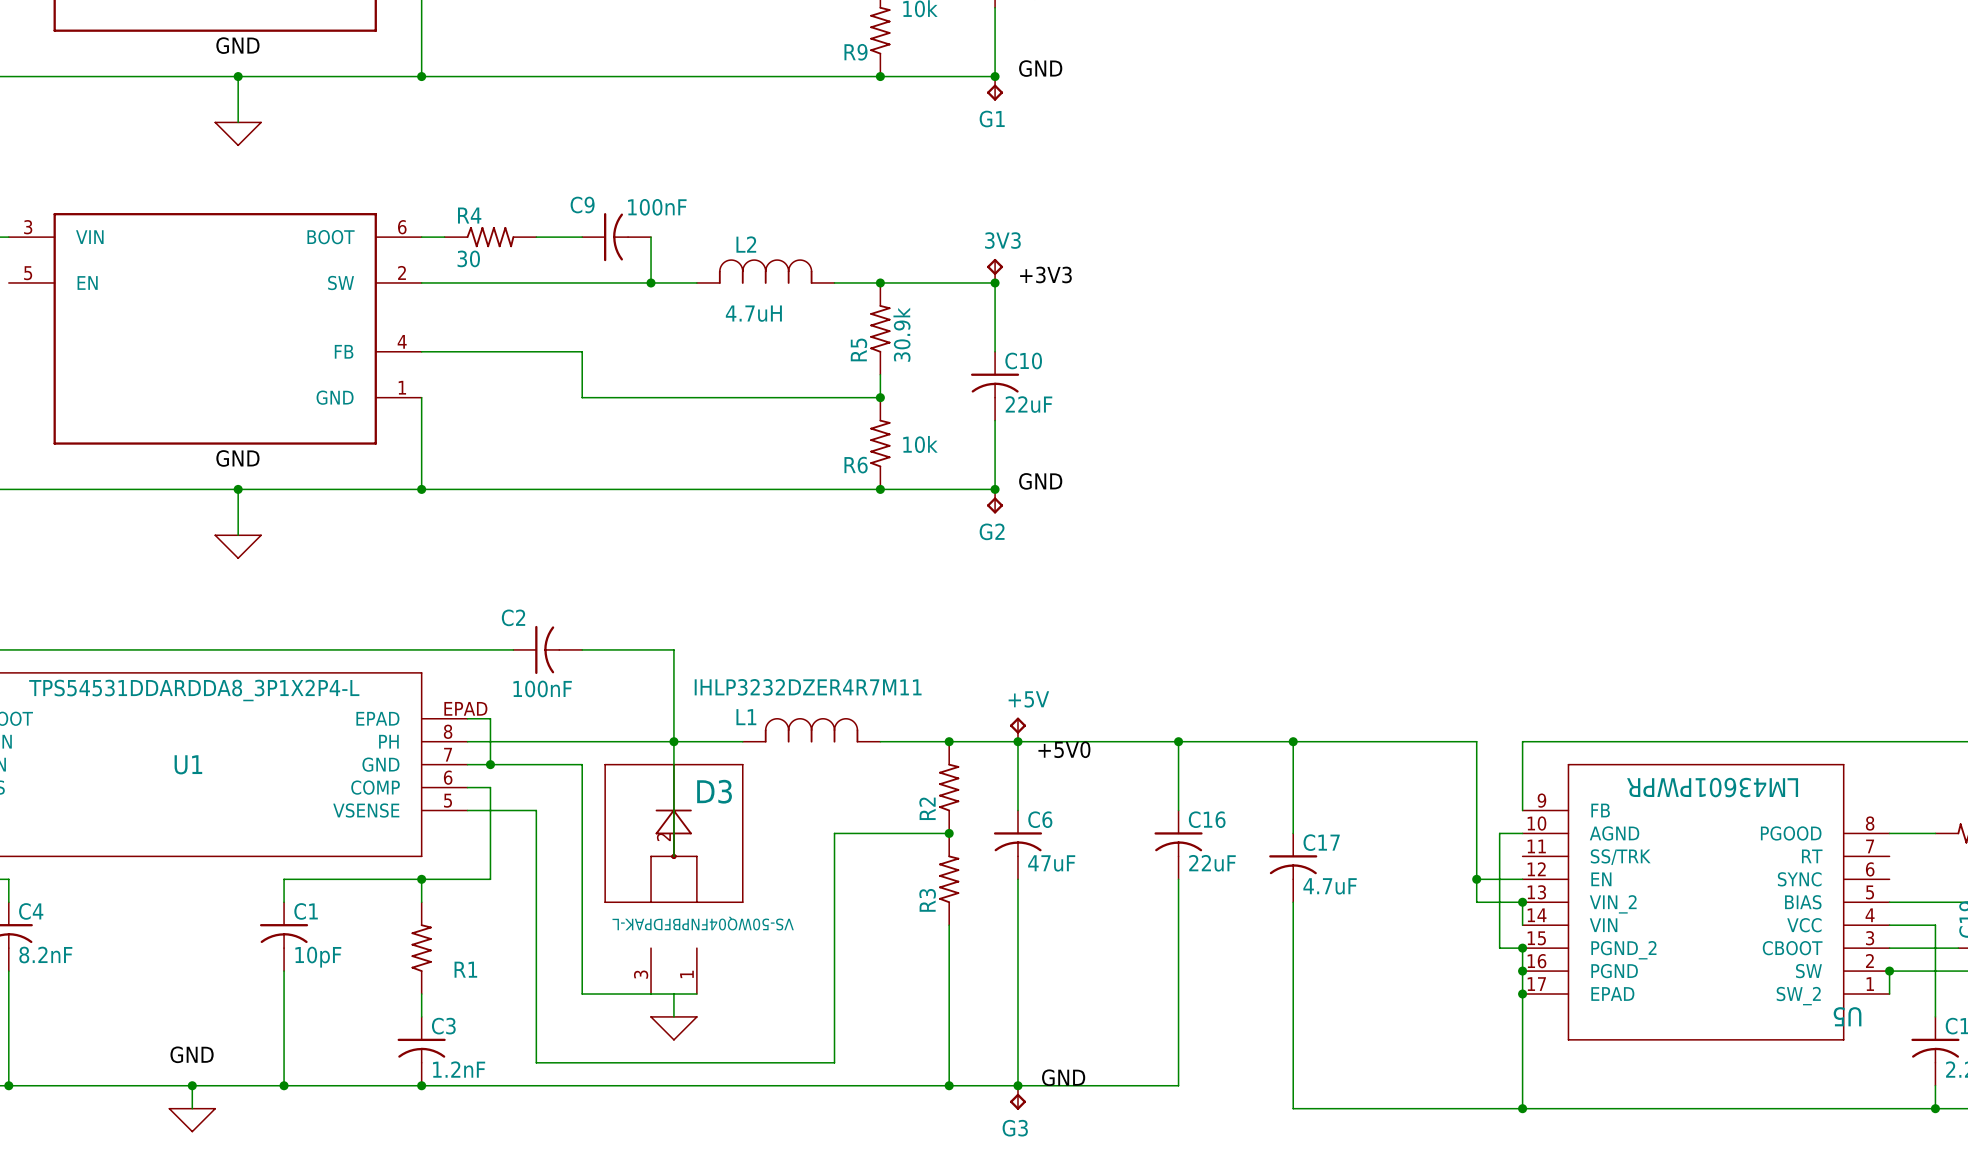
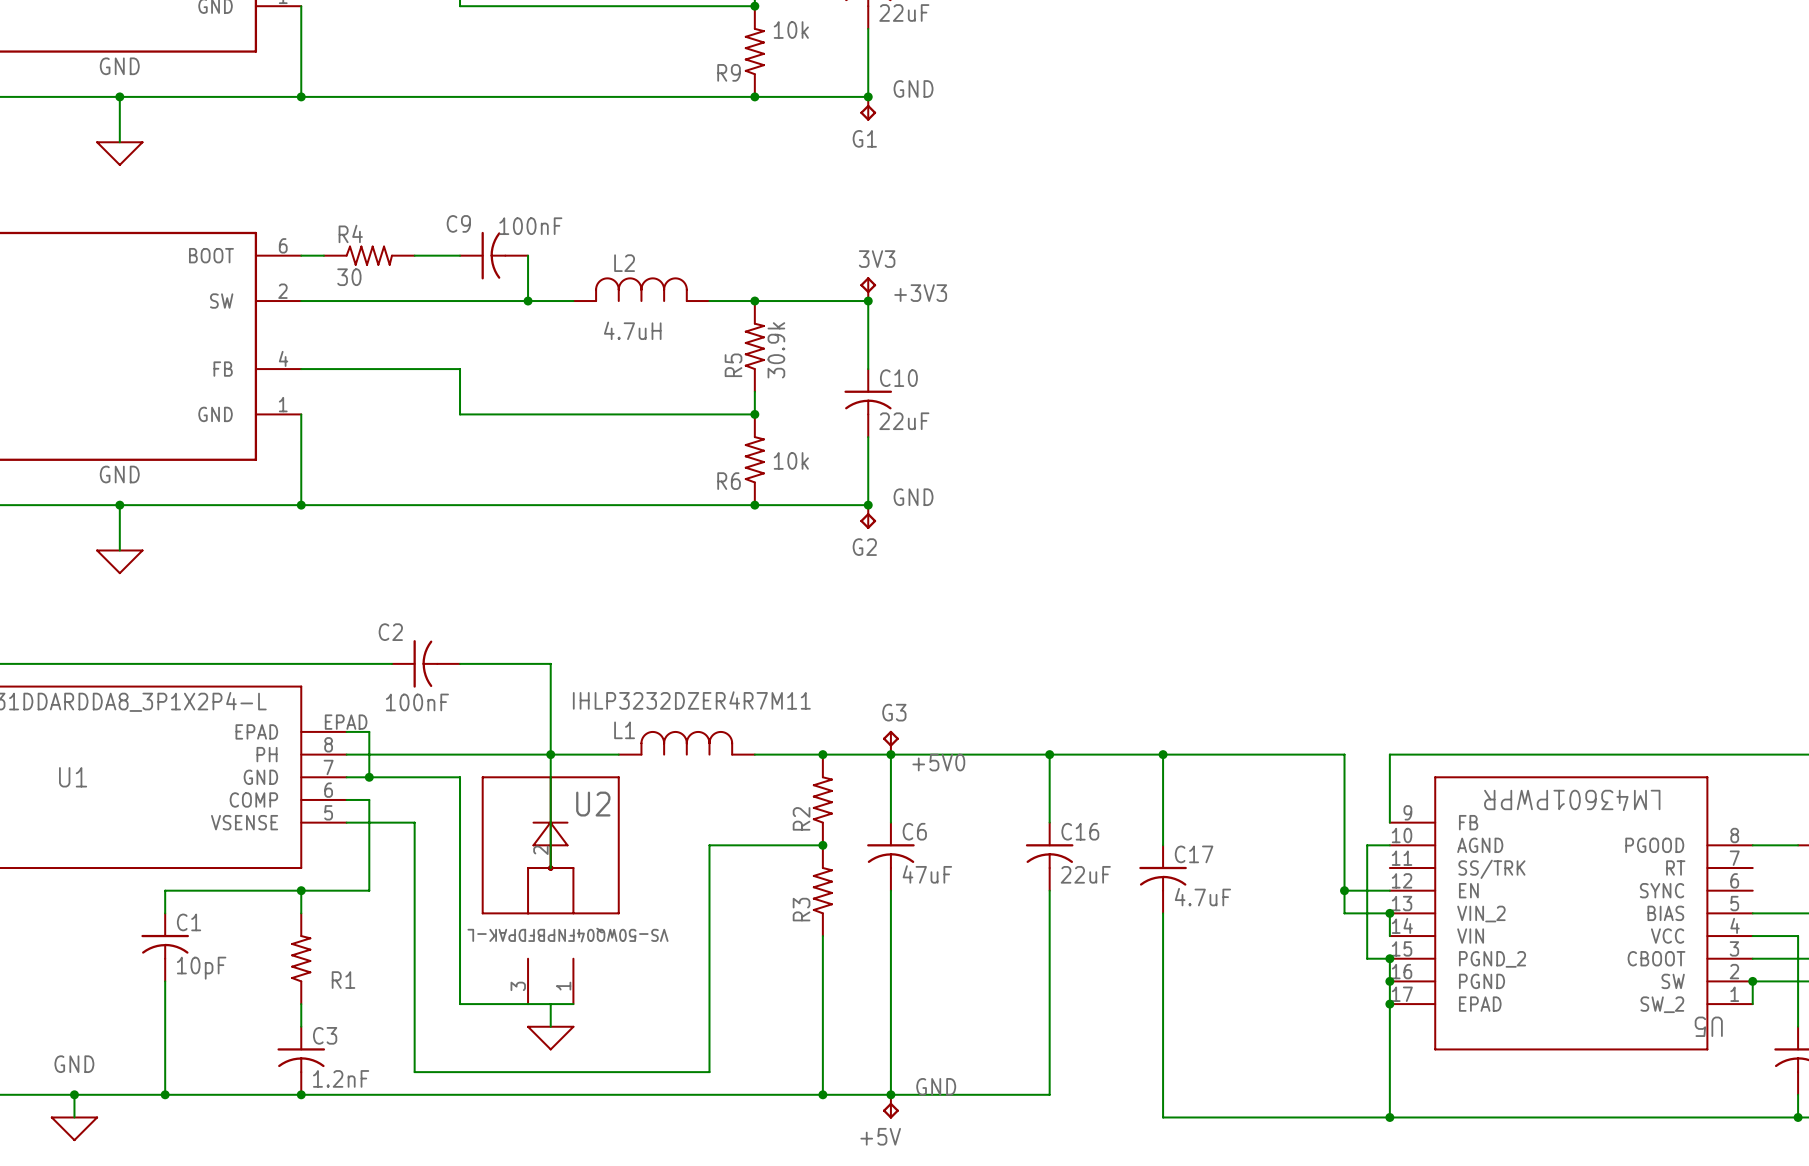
+5V name: +5V (1028, 699) -> G3 (894, 712)
D3 name: D3 (714, 791) -> U2 (593, 804)
G3 name: G3 (1015, 1128) -> +5V (880, 1136)

